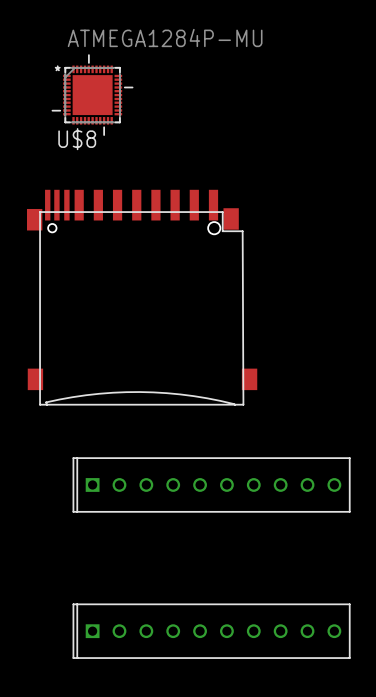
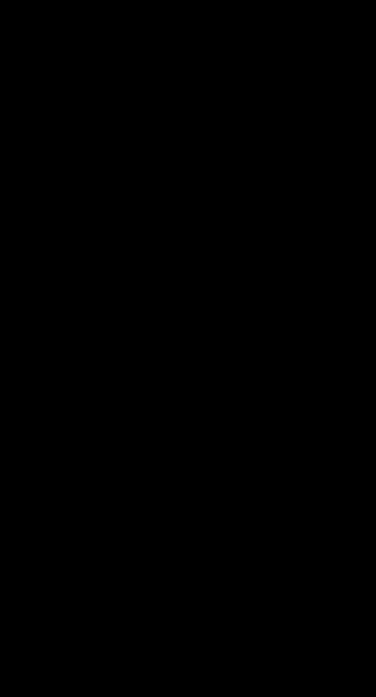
U$8: ATMEGA1284P-MU (92, 95) -> none
part: (142, 297) -> none
part: (211, 484) -> none
part: (211, 631) -> none

